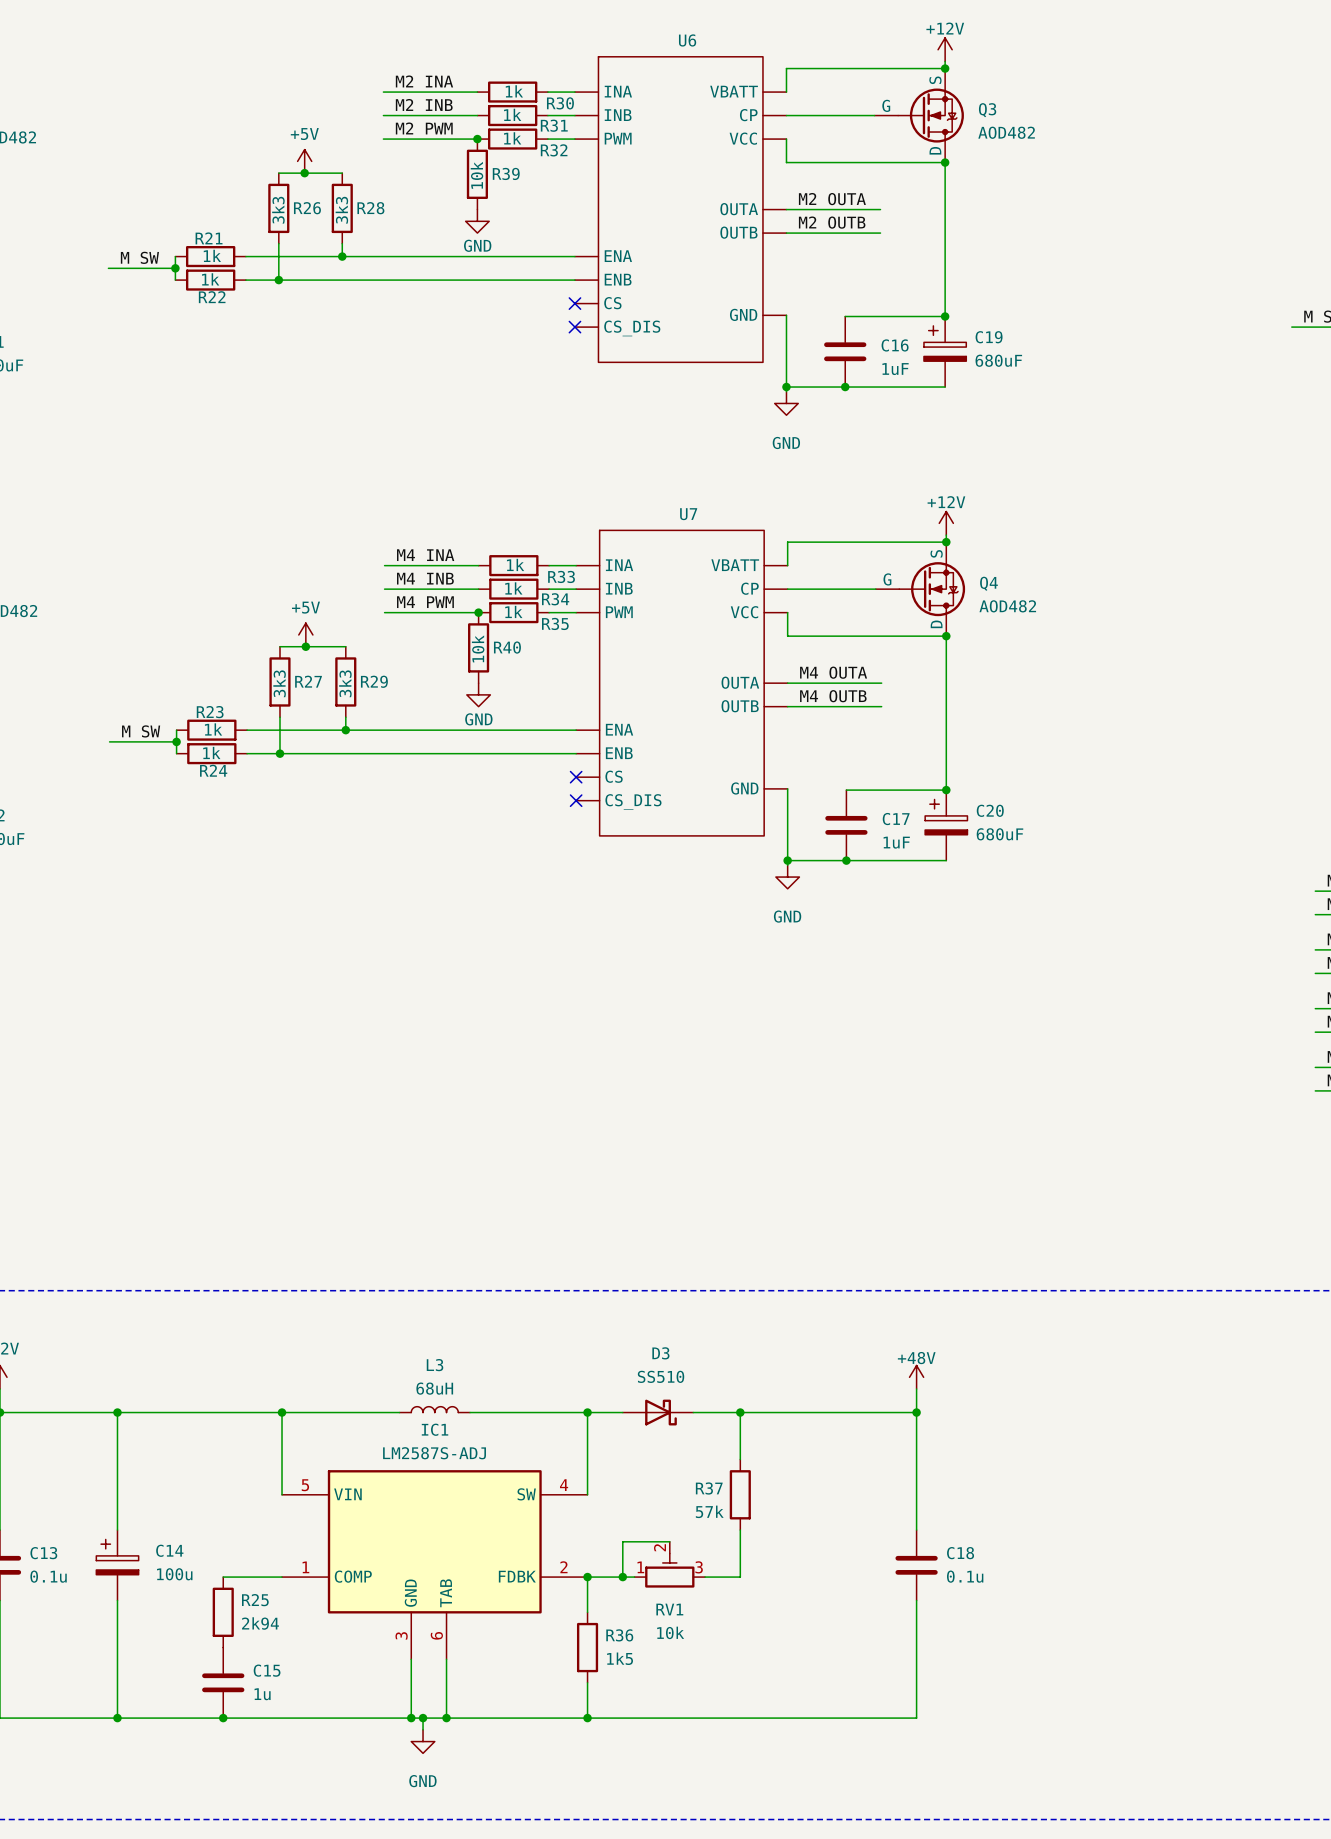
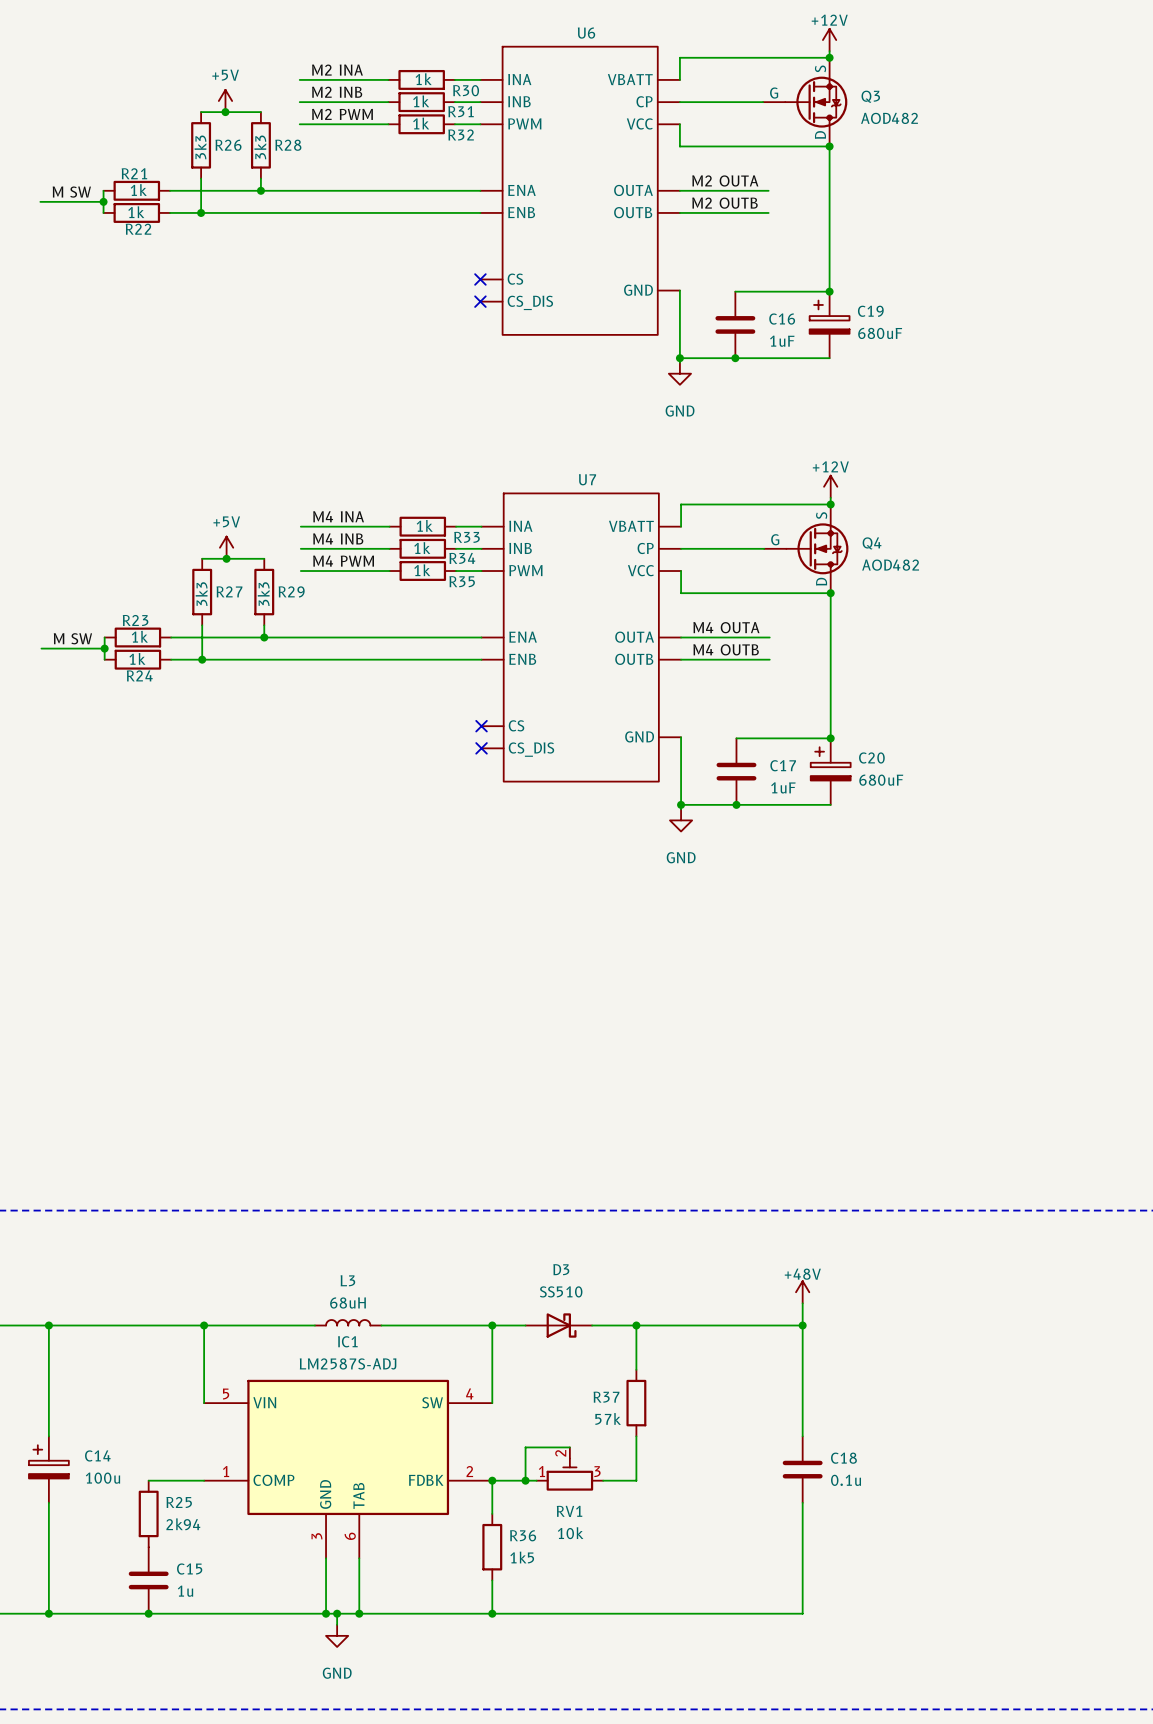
U6 symbol: [574, 56, 787, 363] -> [480, 46, 680, 335]
junction: none -> (225, 112)
junction: (477, 139) -> none
power symbol position: +5V (304, 161) -> +5V (225, 101)
wire: (278, 173) (342, 173) -> (201, 112) (260, 112)
junction: (304, 173) -> none
R39: 10k (477, 174) -> none
R26 position: (278, 208) -> (201, 145)
R28 position: (342, 208) -> (260, 145)
junction: none -> (260, 190)
power symbol: GND (477, 221) -> none
junction: none -> (201, 212)
wire: (278, 243) (278, 280) -> (201, 178) (201, 212)
wire: (342, 243) (342, 256) -> (260, 178) (260, 190)
wire: (175, 256) (175, 280) -> (103, 190) (103, 212)
R21 position: (210, 256) -> (136, 190)
wire: (245, 256) (574, 256) -> (170, 190) (480, 190)
junction: (342, 256) -> none
label position: M SW (139, 257) -> M SW (71, 192)
wire: (108, 268) (175, 268) -> (40, 201) (103, 201)
junction position: (175, 268) -> (103, 201)
R22 position: (210, 280) -> (136, 212)
wire: (245, 280) (574, 280) -> (170, 212) (480, 212)
junction: (278, 280) -> none
U7 symbol: [576, 530, 788, 836] -> [481, 493, 682, 782]
junction: none -> (226, 558)
junction: (478, 612) -> none
power symbol position: +5V (305, 634) -> +5V (226, 547)
wire: (279, 646) (345, 646) -> (202, 558) (264, 558)
junction: (305, 646) -> none
R40: 10k (478, 647) -> none
R27 position: (279, 681) -> (202, 592)
R29 position: (345, 681) -> (264, 592)
junction: none -> (264, 637)
power symbol: GND (478, 694) -> none
junction: none -> (202, 659)
wire: (279, 717) (279, 753) -> (202, 625) (202, 659)
wire: (345, 717) (345, 730) -> (264, 625) (264, 637)
wire: (176, 730) (176, 753) -> (104, 637) (104, 659)
R23 position: (211, 730) -> (137, 637)
wire: (247, 730) (576, 730) -> (171, 637) (481, 637)
junction: (345, 730) -> none
label position: M SW (141, 731) -> M SW (72, 638)
wire: (109, 741) (176, 741) -> (41, 648) (104, 648)
junction position: (176, 741) -> (104, 648)
R24 position: (211, 753) -> (137, 659)
wire: (247, 753) (576, 753) -> (171, 659) (481, 659)
junction: (279, 753) -> none

